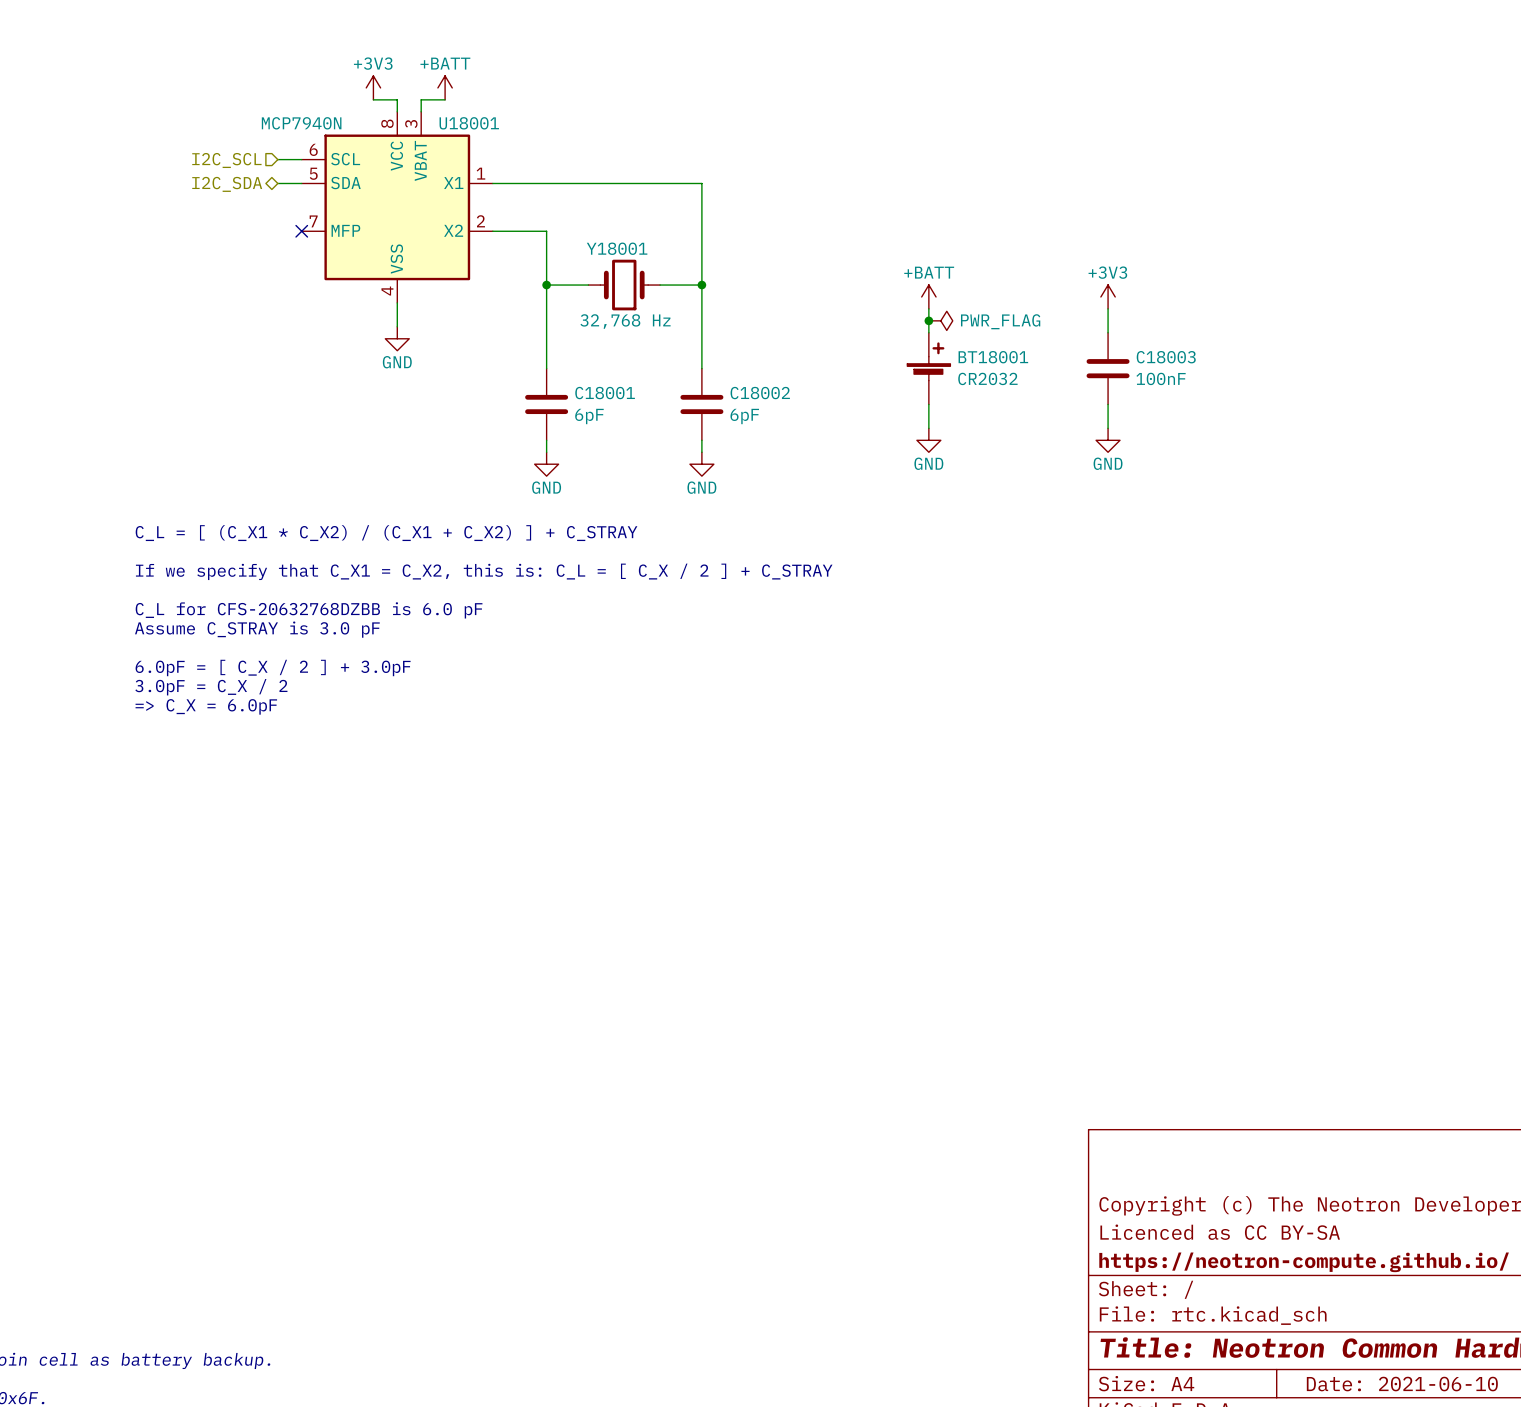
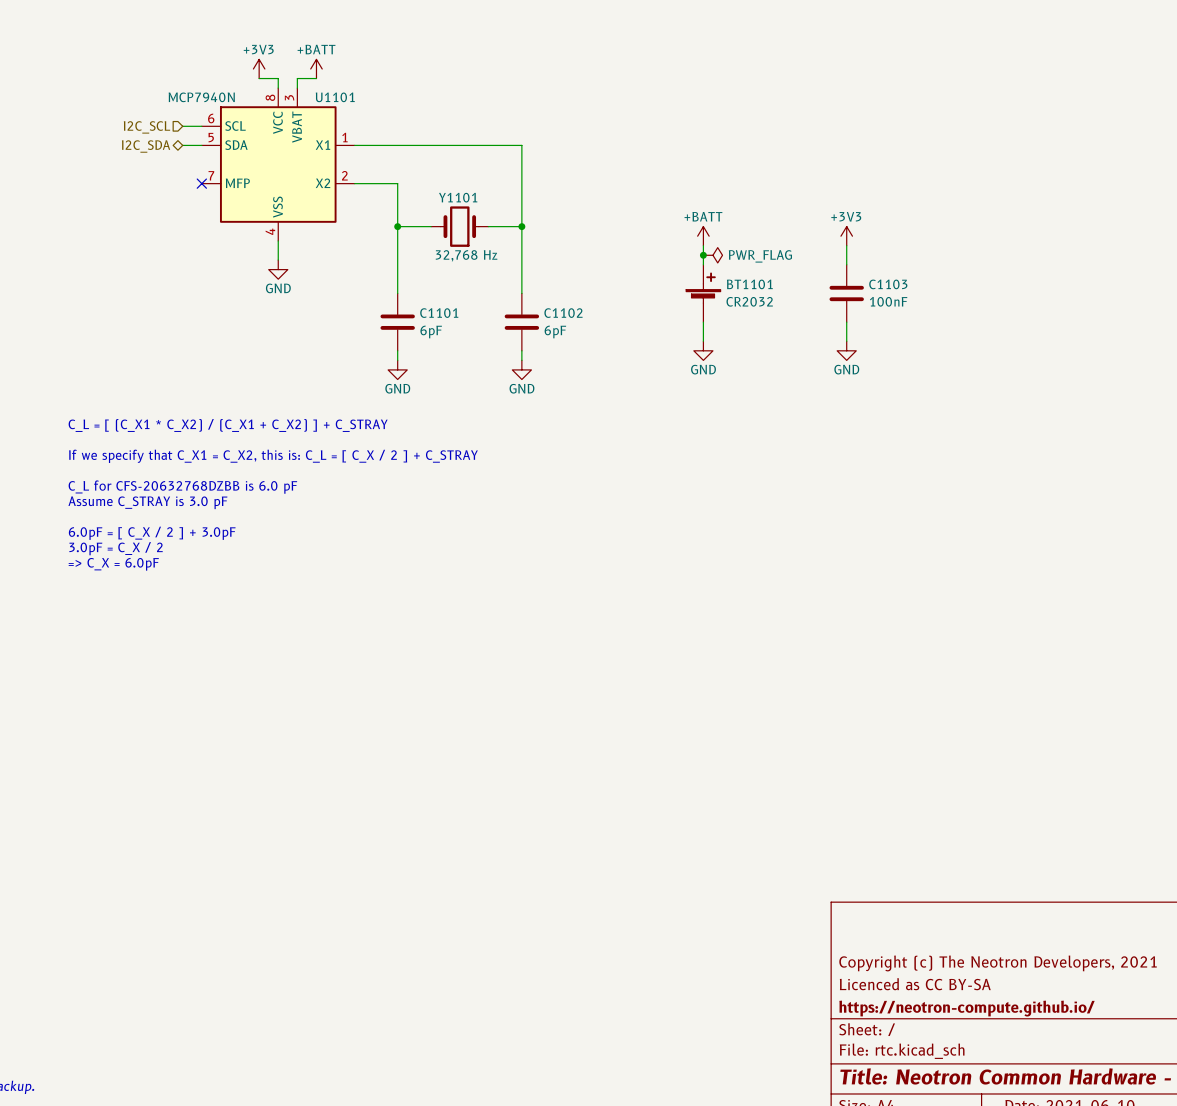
U18001 name: U18001 (469, 123) -> U1101 (335, 97)
Y18001 name: Y18001 (617, 248) -> Y1101 (458, 197)
BT18001 name: BT18001 (993, 357) -> BT1101 (749, 284)
C18003 name: C18003 (1166, 357) -> C1103 (888, 284)
C18001 name: C18001 (605, 393) -> C1101 (439, 313)
C18002 name: C18002 (760, 393) -> C1102 (563, 313)

